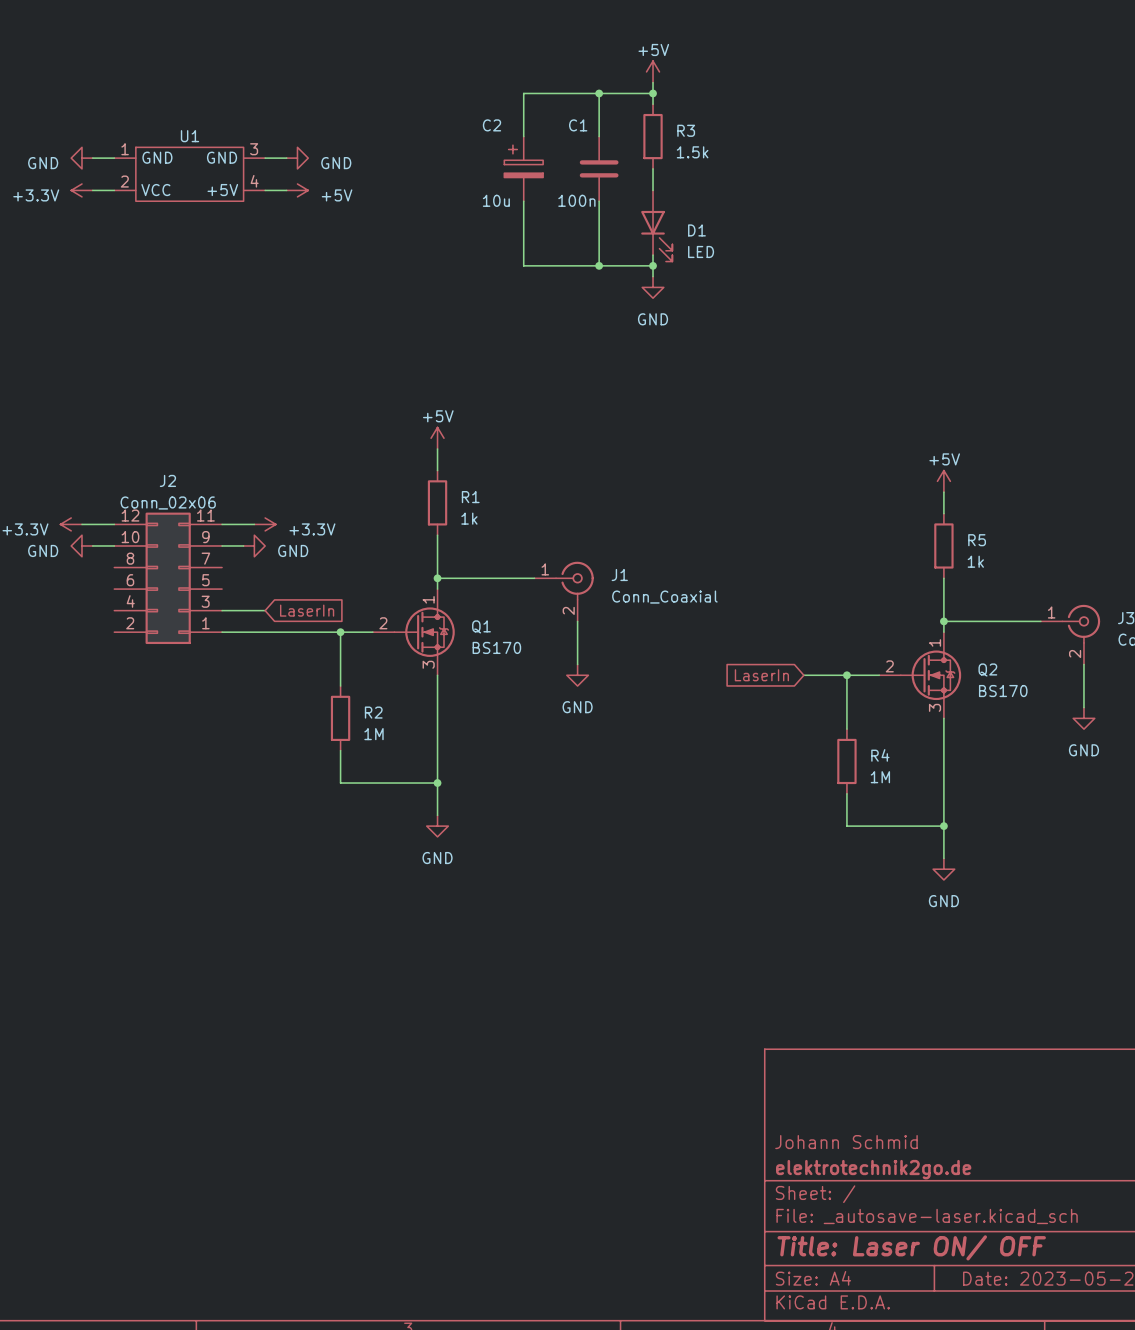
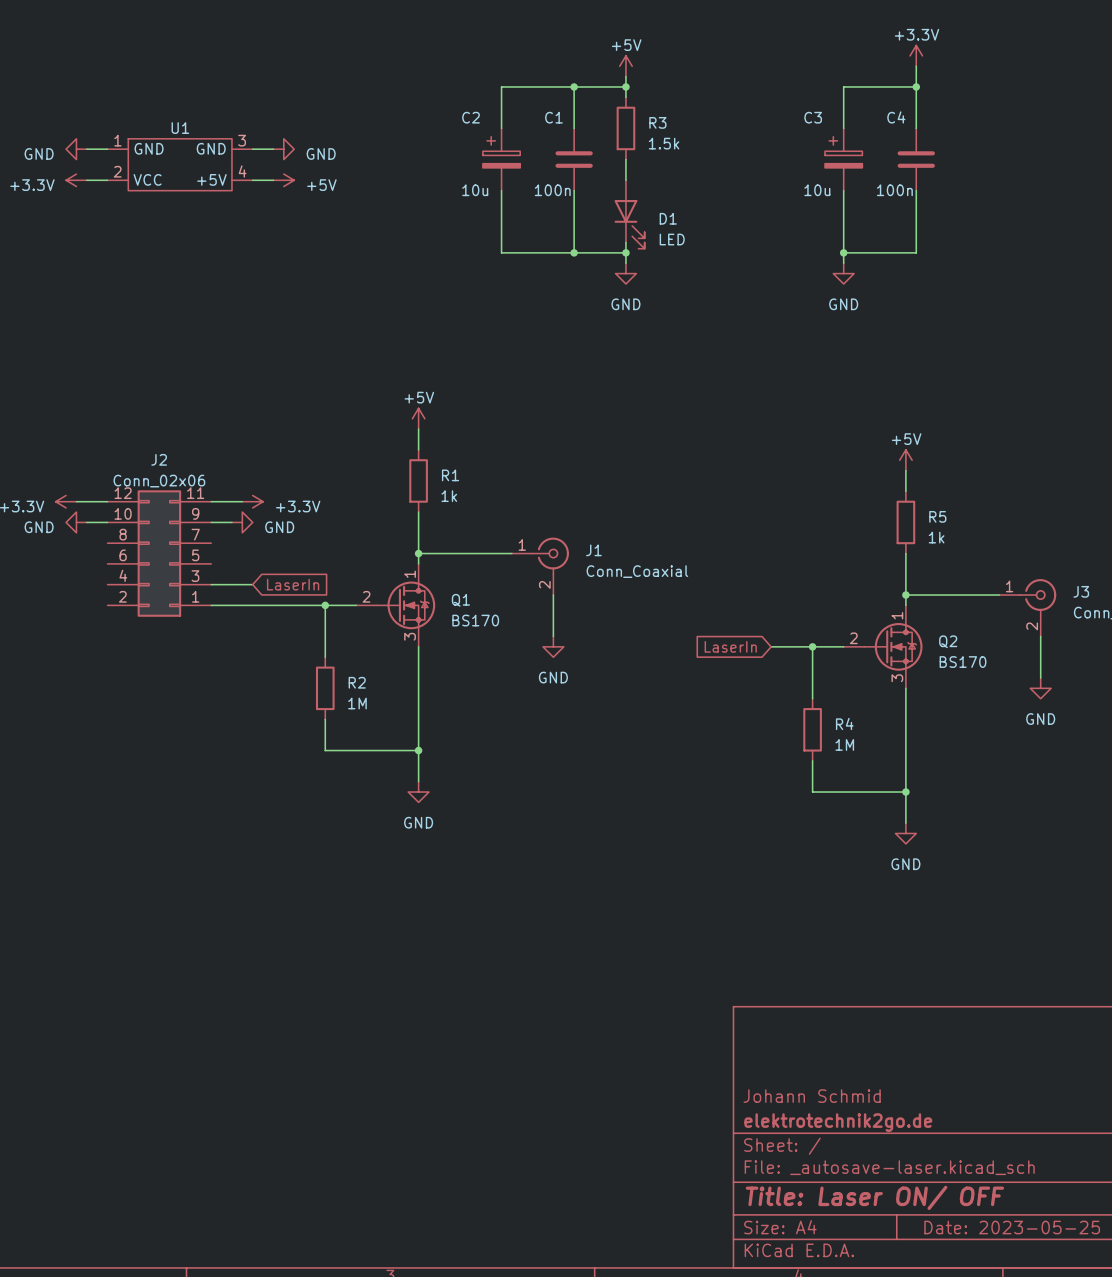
power symbol: none -> +3.3V (916, 55)
wire: none -> (916, 66) (916, 128)
wire: none -> (916, 86) (843, 86) (843, 128)
junction: none -> (916, 86)
C3: none -> 10u (843, 159)
C4: none -> 100n (916, 159)
wire: none -> (843, 190) (843, 263)
wire: none -> (916, 190) (916, 252) (843, 252)
junction: none -> (843, 252)
power symbol: none -> GND (843, 273)

